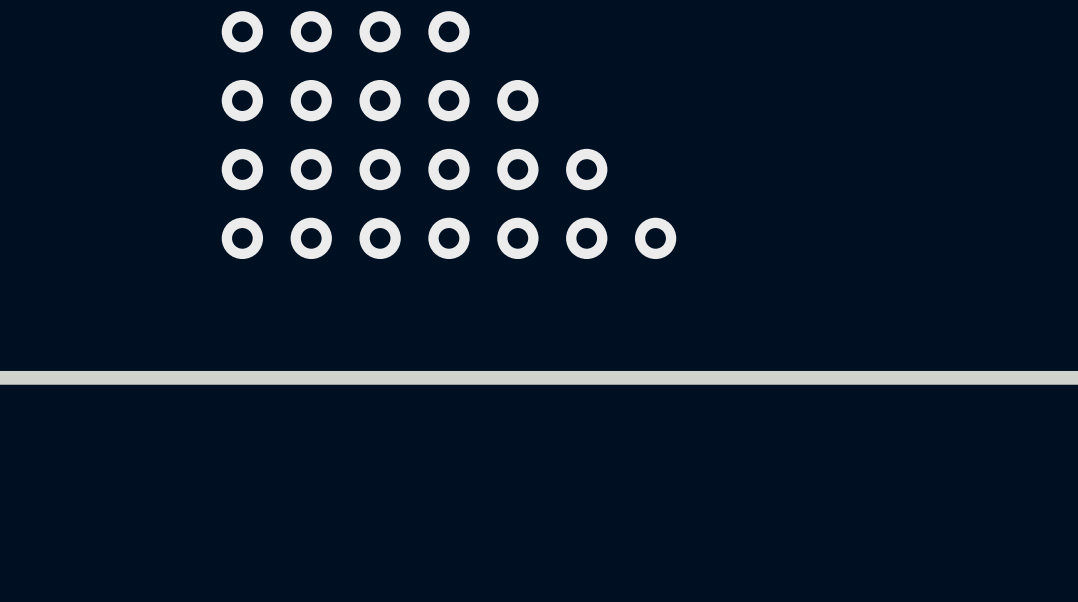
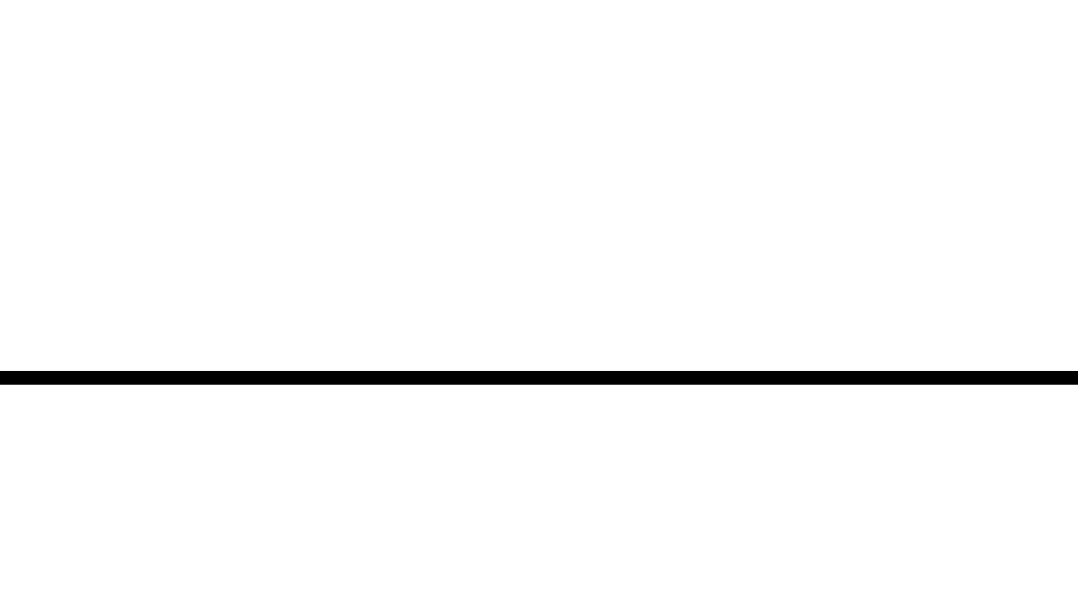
via: (242, 31) -> none
via: (311, 31) -> none
via: (380, 31) -> none
via: (448, 31) -> none
via: (242, 100) -> none
via: (311, 100) -> none
via: (380, 100) -> none
via: (448, 100) -> none
via: (517, 100) -> none
via: (242, 169) -> none
via: (311, 169) -> none
via: (380, 169) -> none
via: (448, 169) -> none
via: (517, 169) -> none
via: (586, 169) -> none
via: (242, 238) -> none
via: (311, 238) -> none
via: (380, 238) -> none
via: (448, 238) -> none
via: (517, 238) -> none
via: (586, 238) -> none
via: (655, 238) -> none

